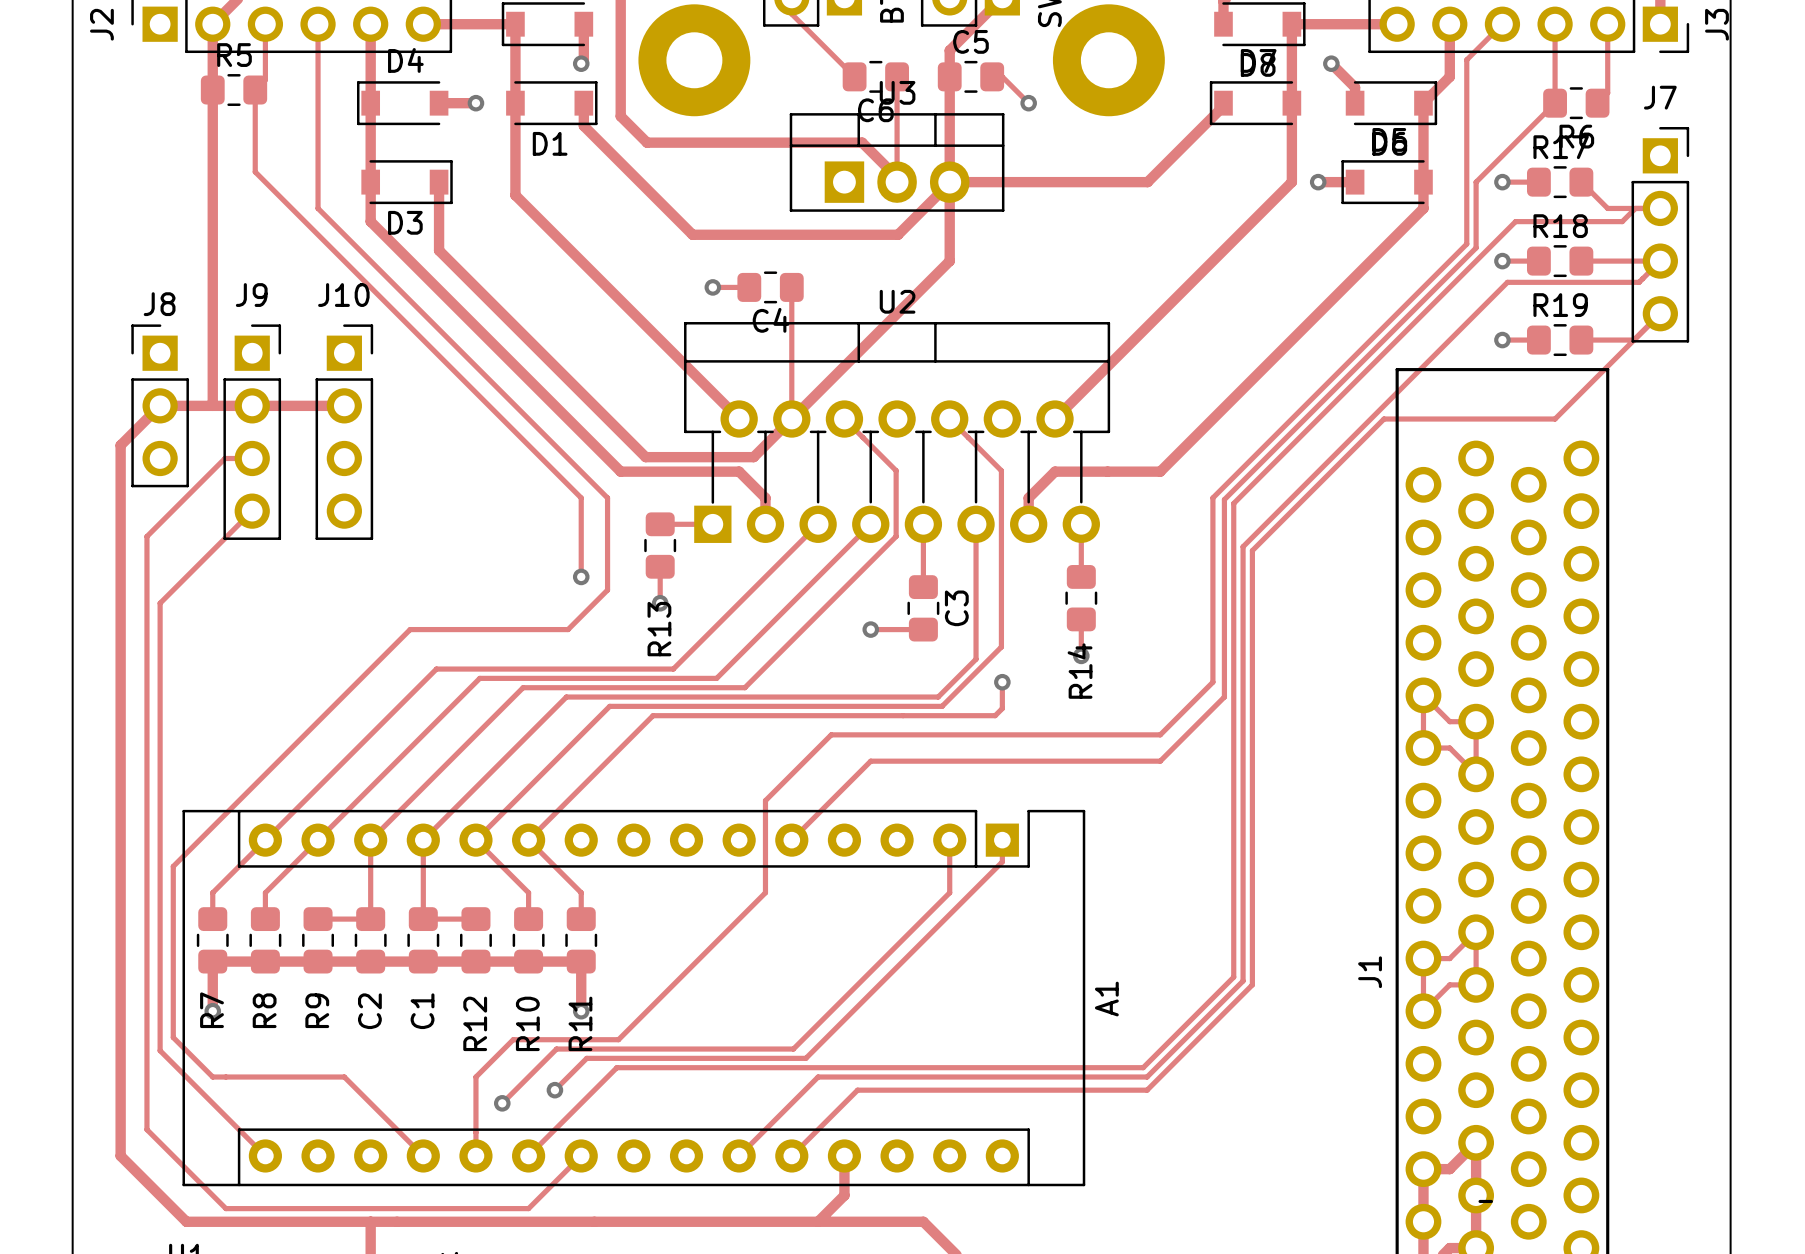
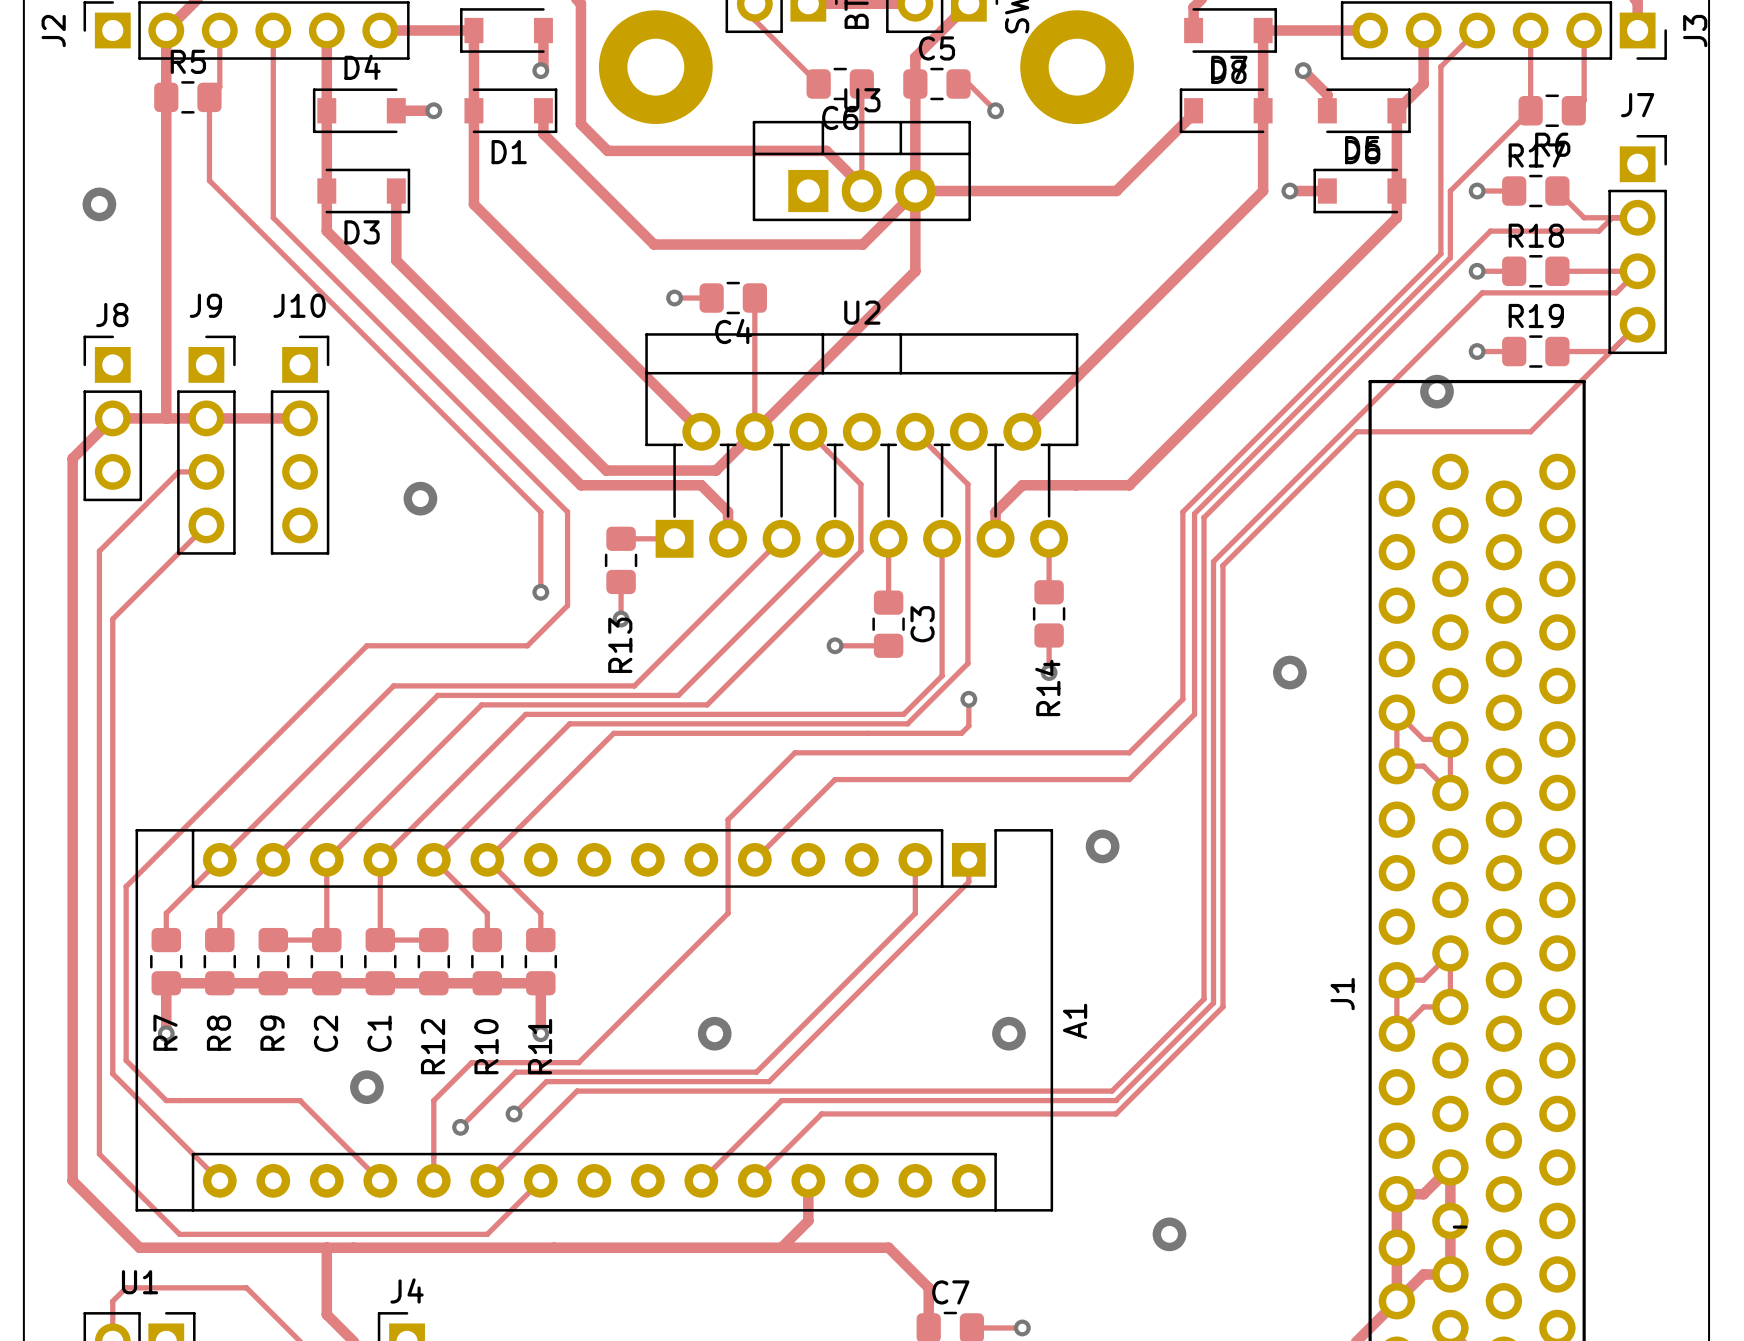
via: none -> (99, 204)
via: none -> (1437, 391)
via: none -> (420, 498)
via: none -> (1289, 672)
via: none -> (1102, 846)
via: none -> (714, 1033)
via: none -> (1008, 1033)
via: none -> (366, 1087)
via: none -> (1169, 1234)

